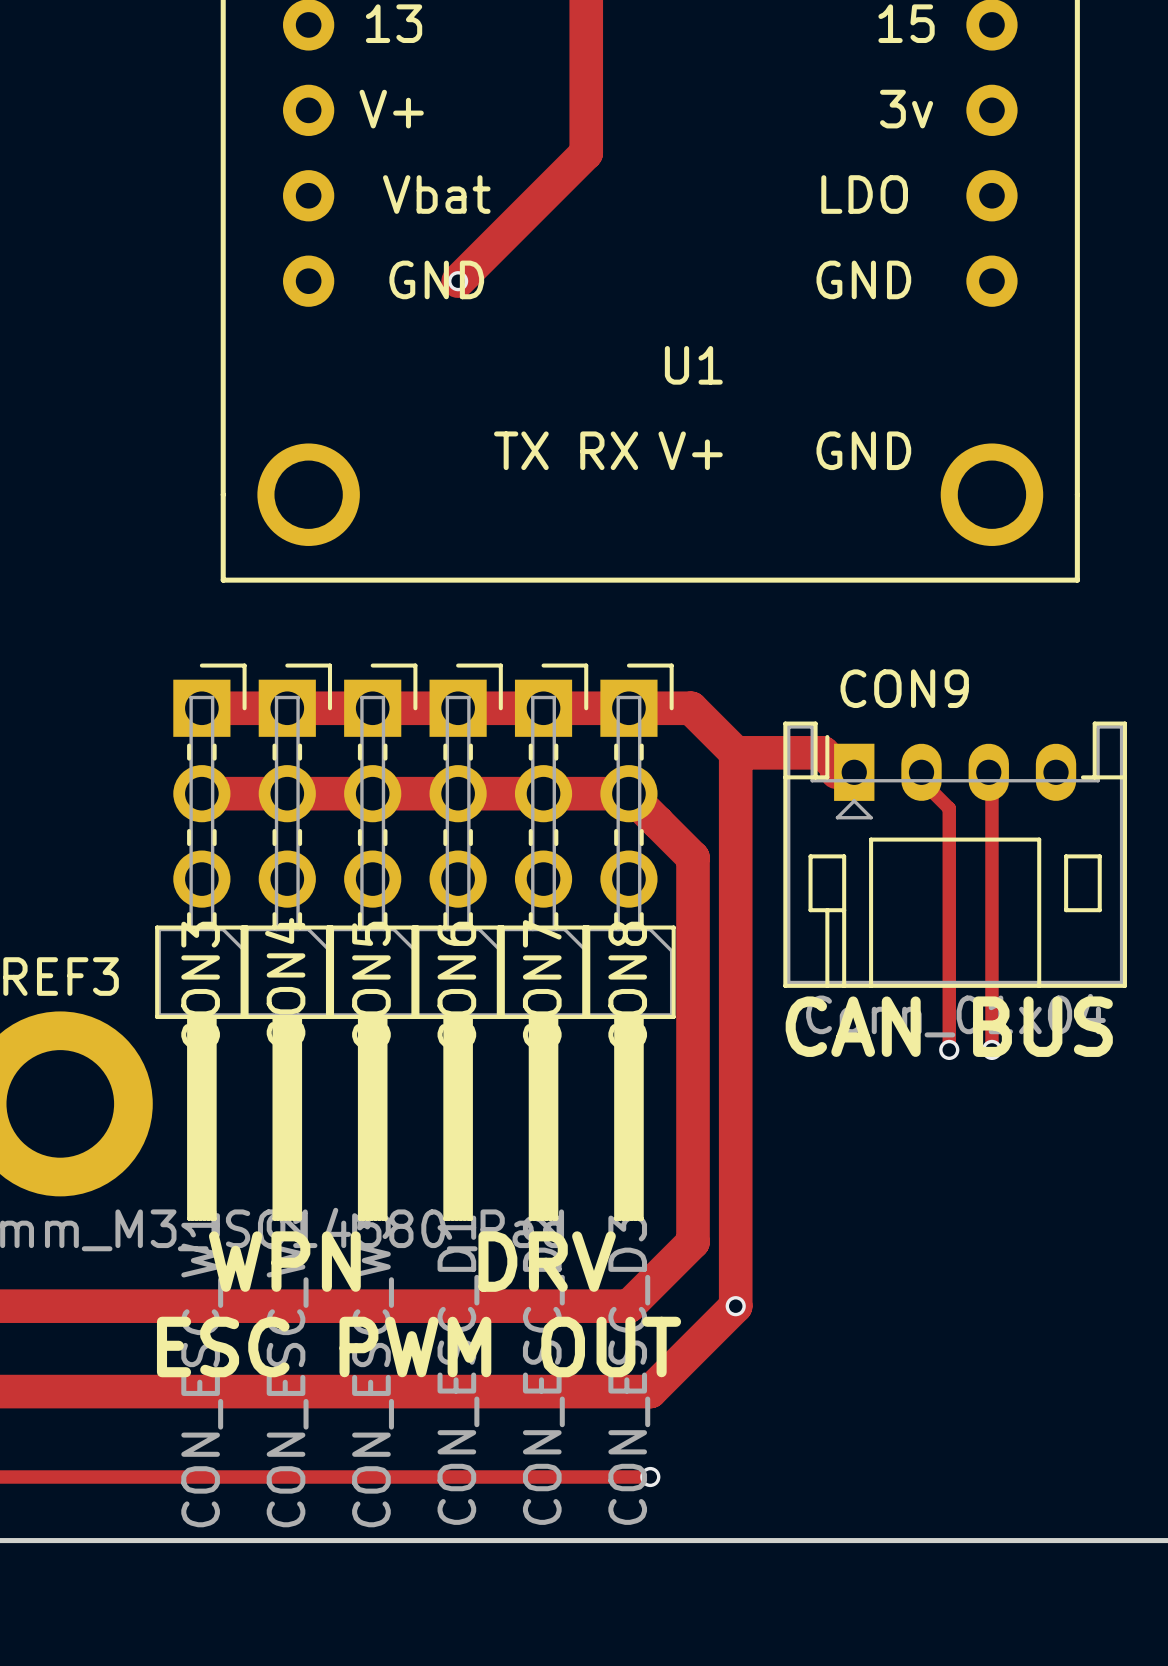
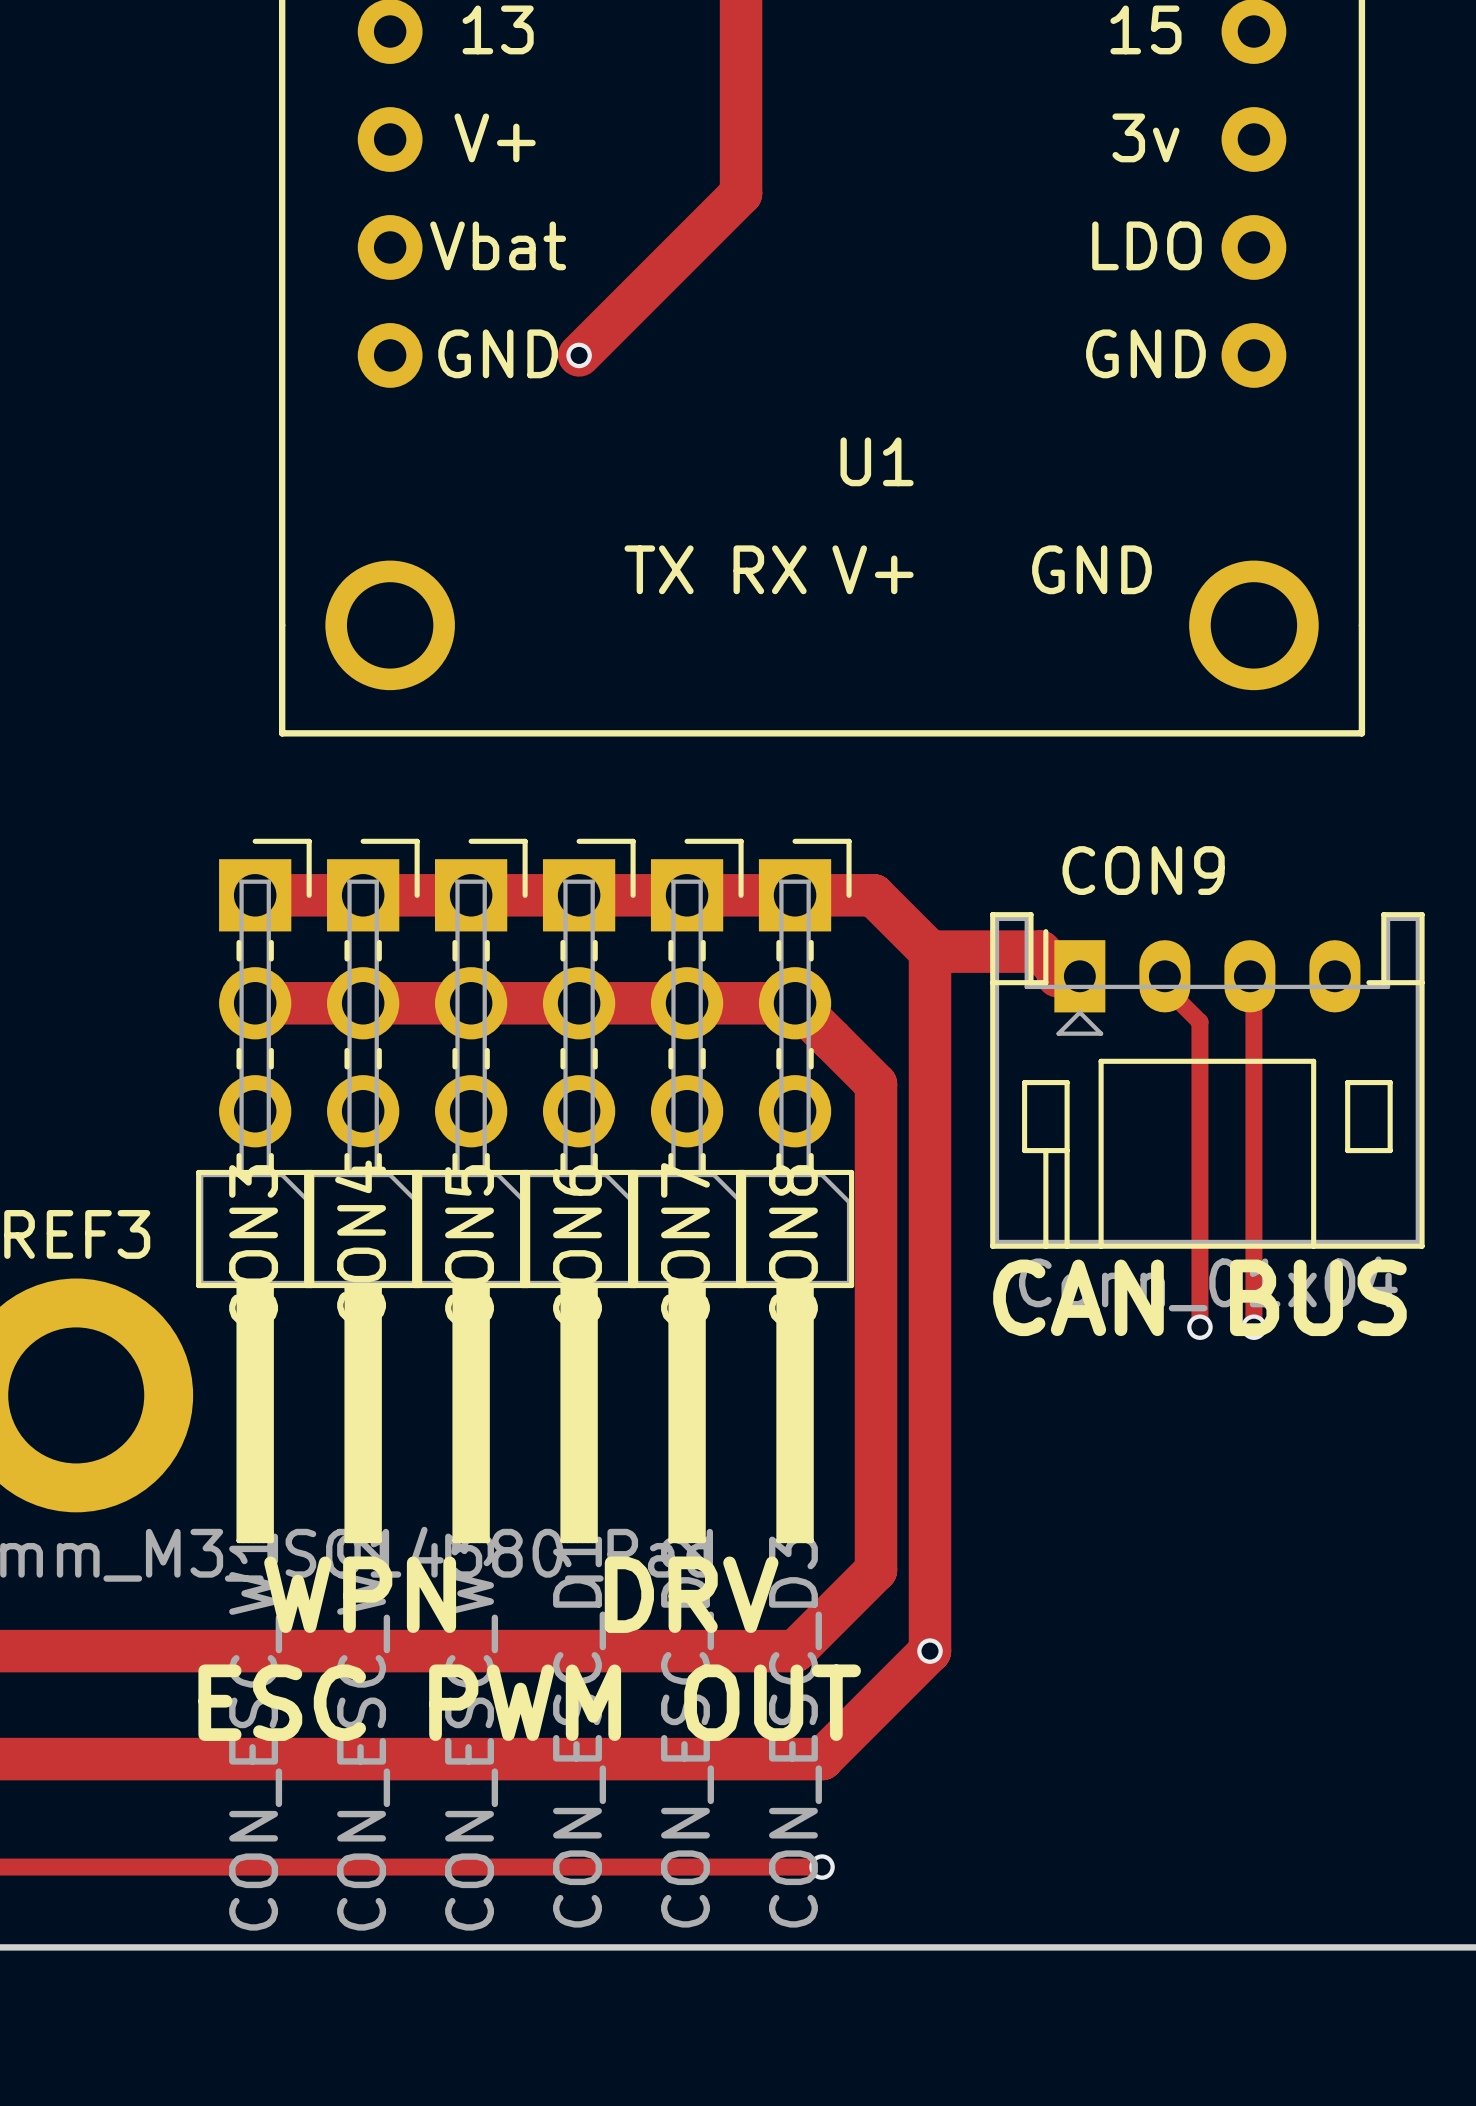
U1 text position: Vbat (436, 194) -> Vbat (498, 245)
U1 text position: LDO (864, 194) -> LDO (1146, 245)
U1 text position: GND (436, 279) -> GND (498, 353)
U1 text position: GND (863, 279) -> GND (1145, 353)

